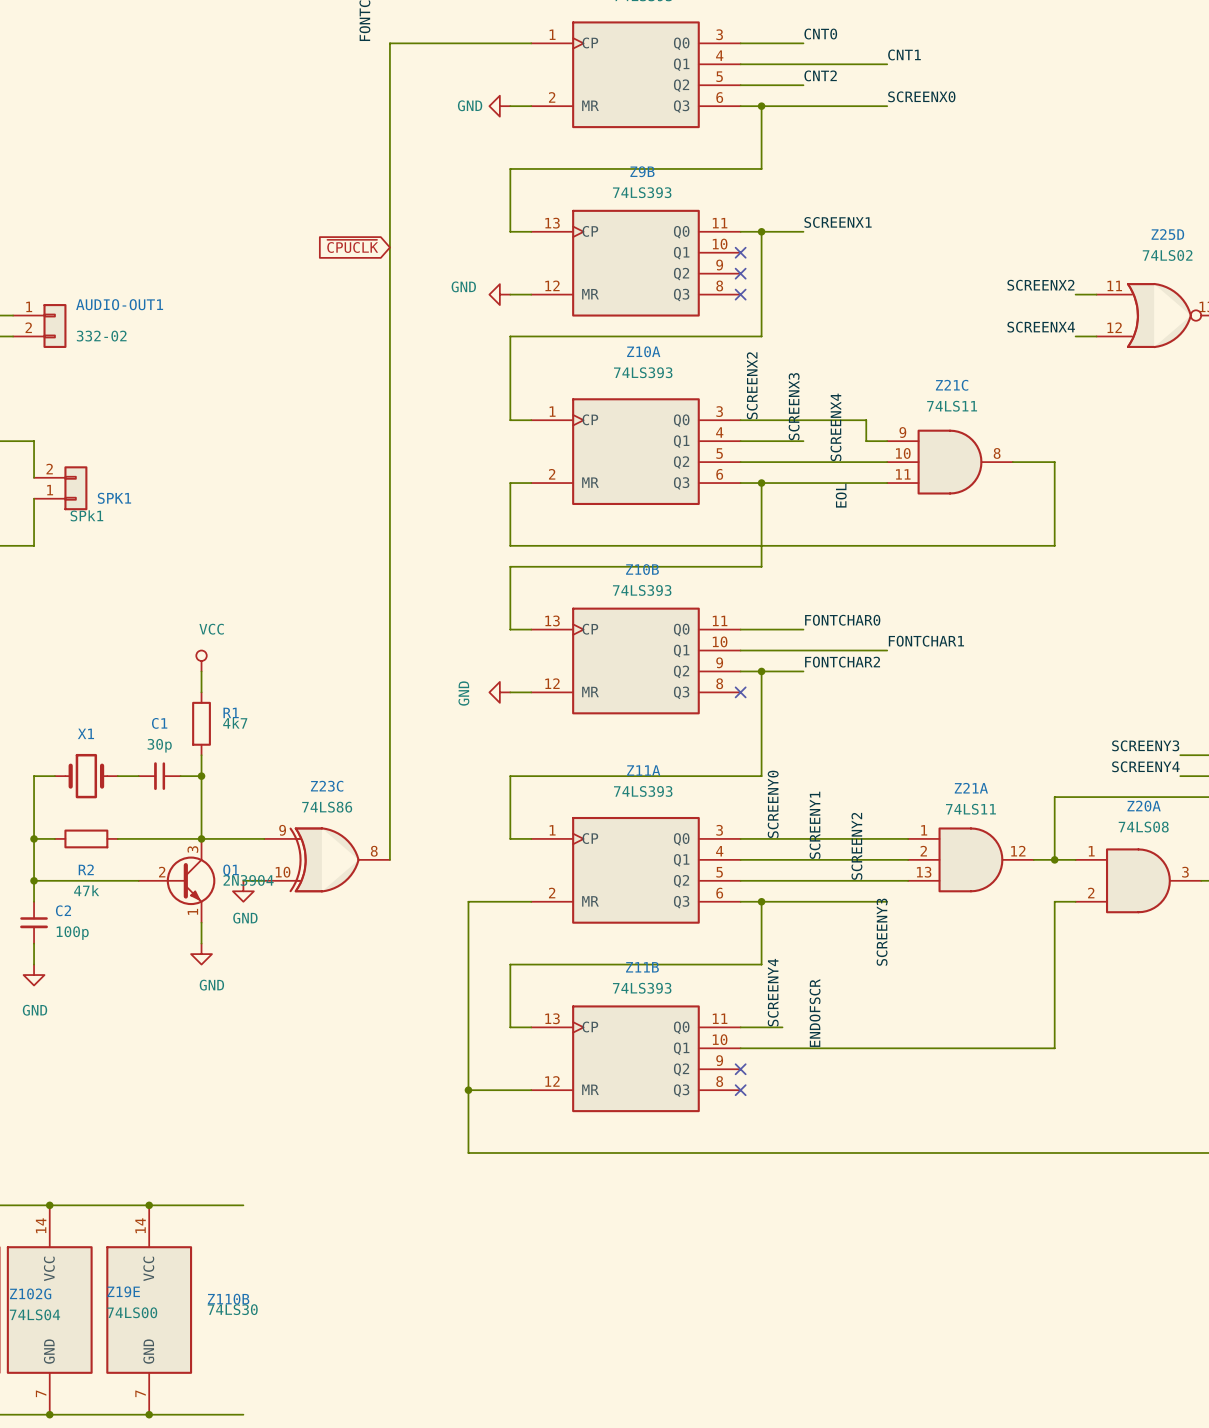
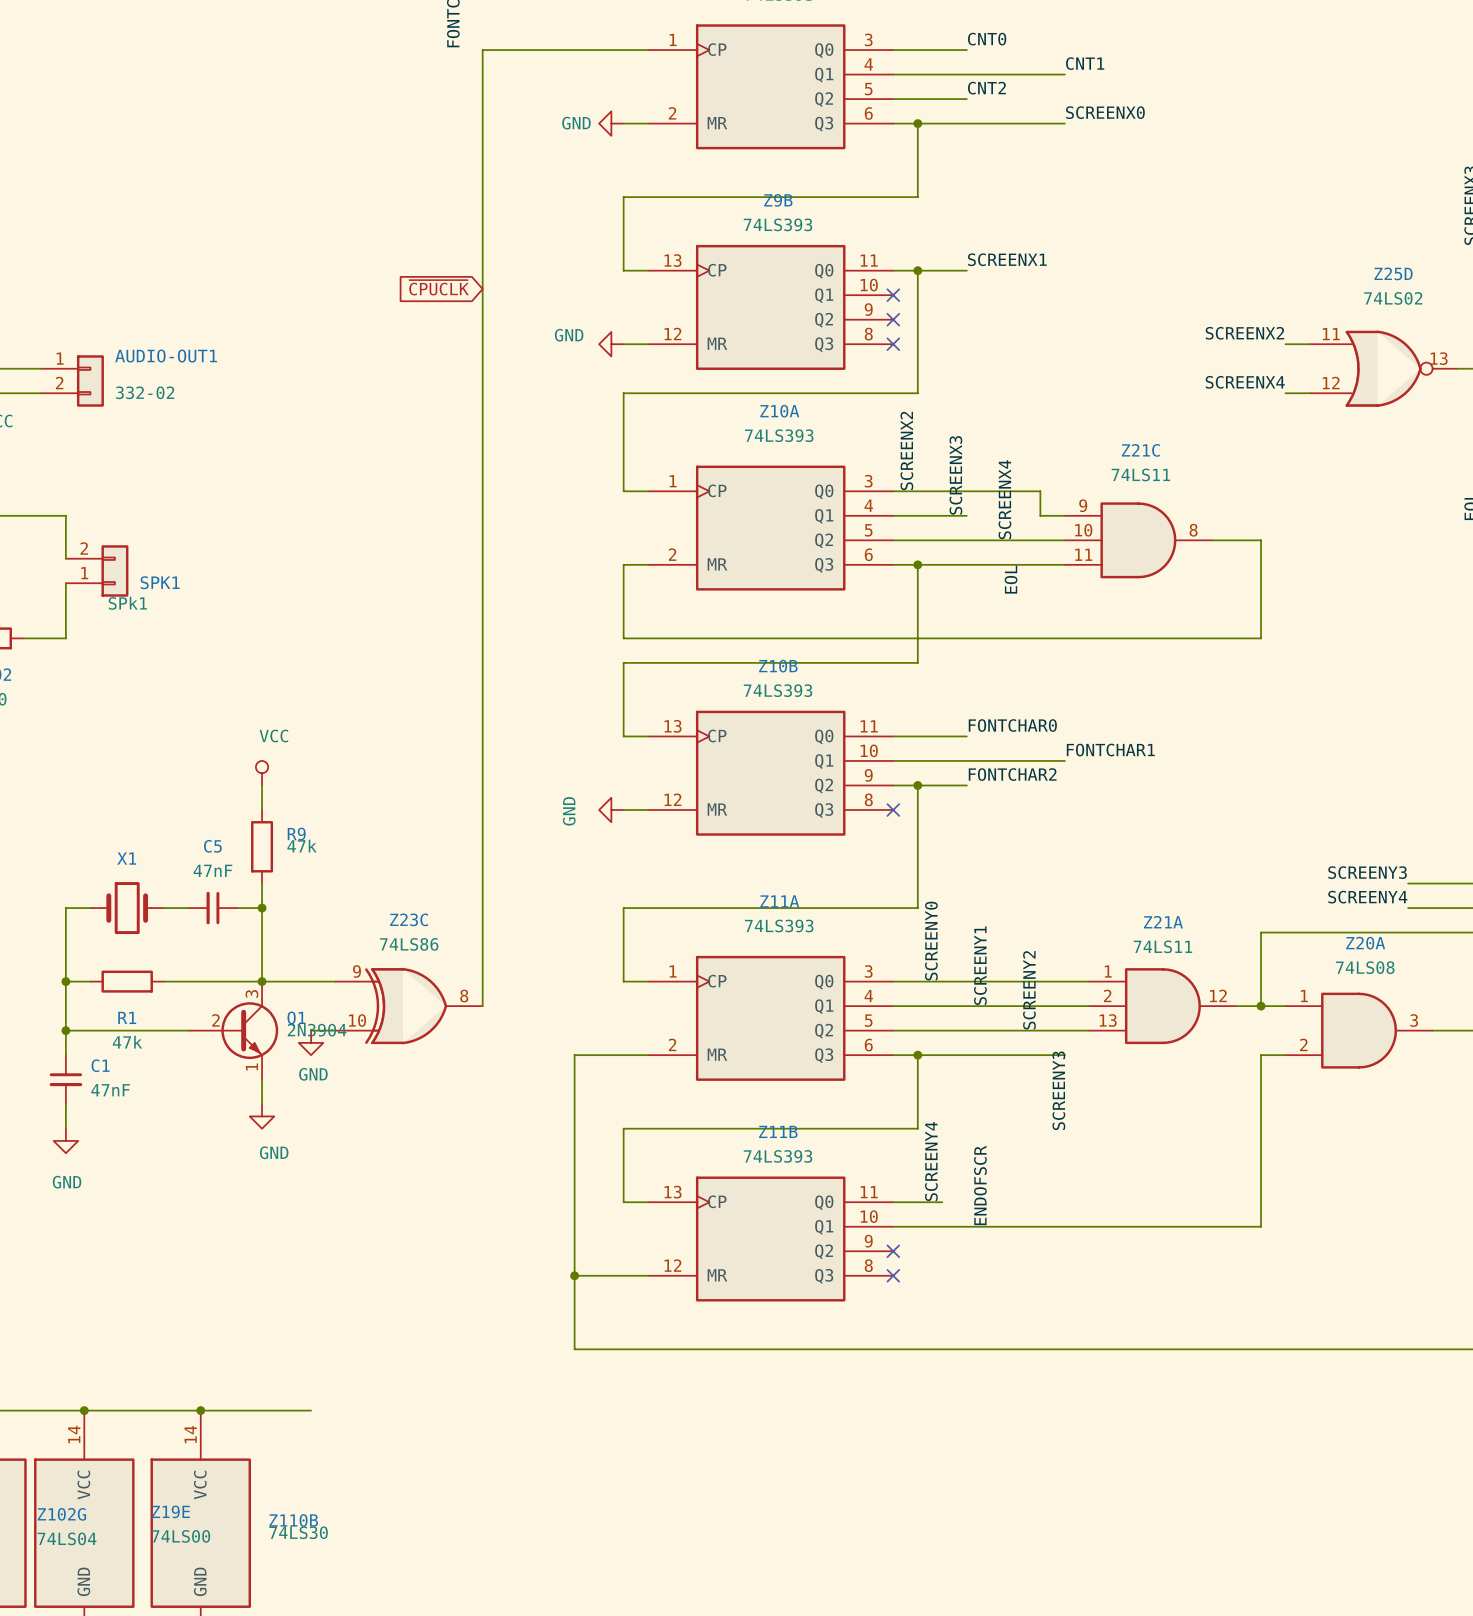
R1 name: R1 (231, 712) -> R9 (296, 834)
C1 name: C1 (159, 723) -> C5 (212, 846)
R1 value: 4k7 (235, 723) -> 47k (302, 846)
C1 value: 30p (159, 745) -> 47nF (212, 870)
R2 name: R2 (86, 869) -> R1 (127, 1017)
C2 name: C2 (63, 910) -> C1 (100, 1065)
C2 value: 100p (72, 933) -> 47nF (110, 1090)

